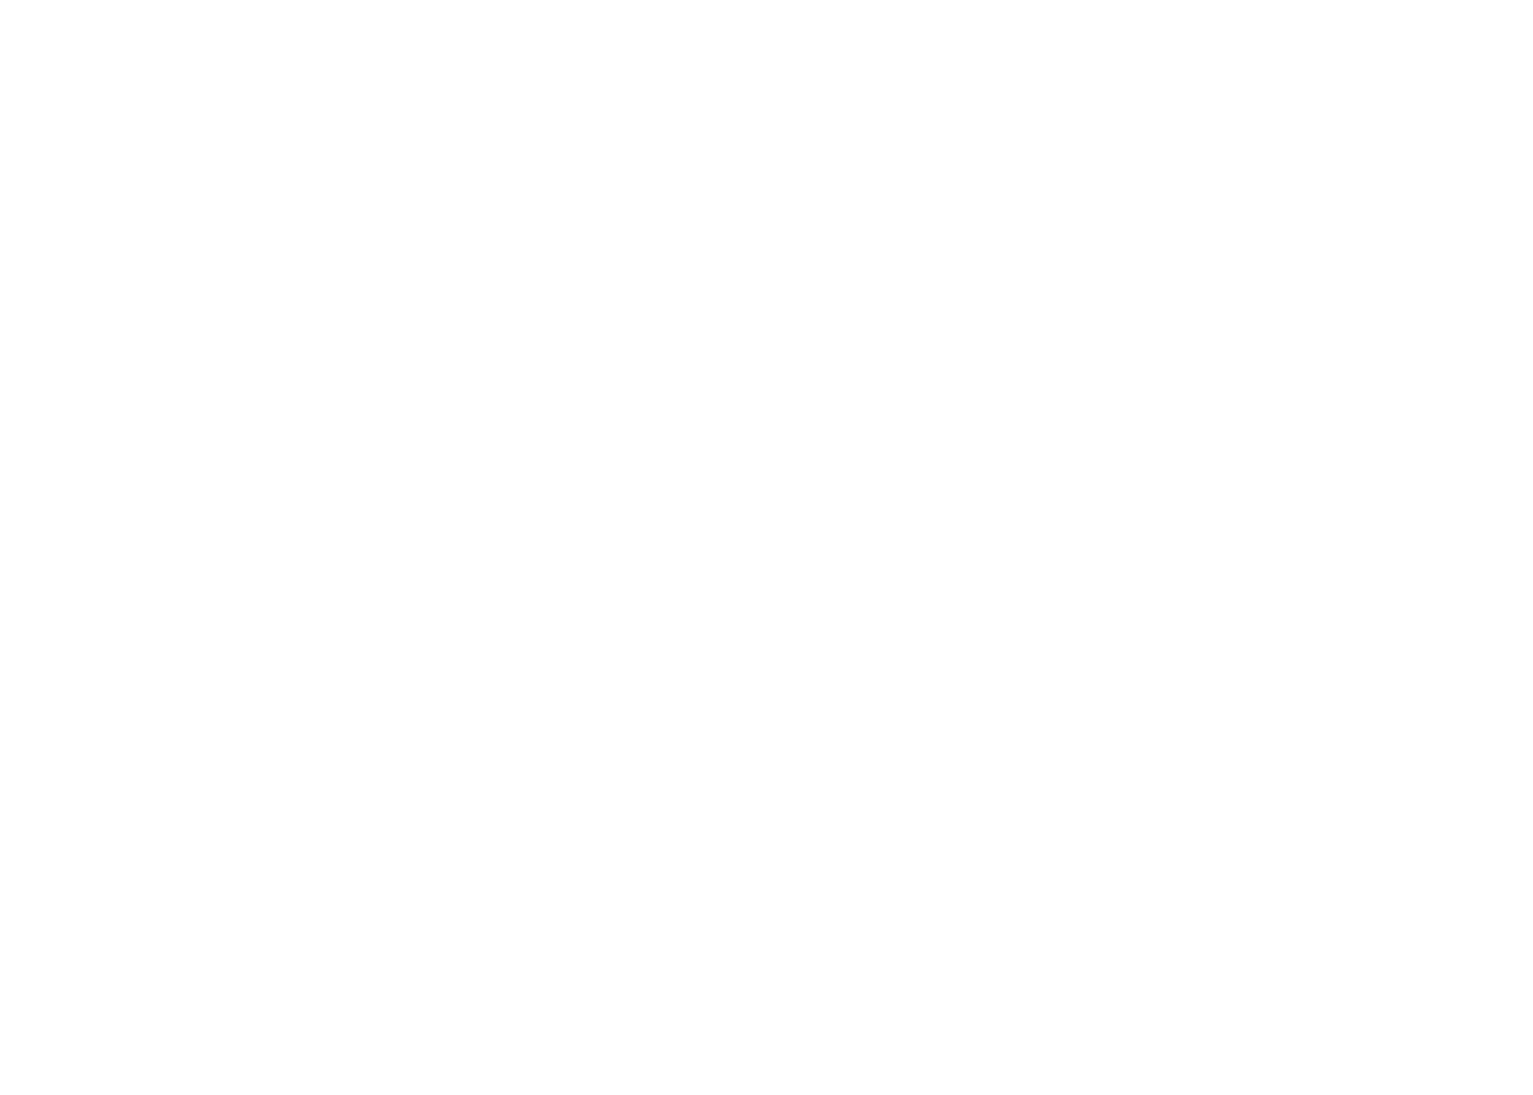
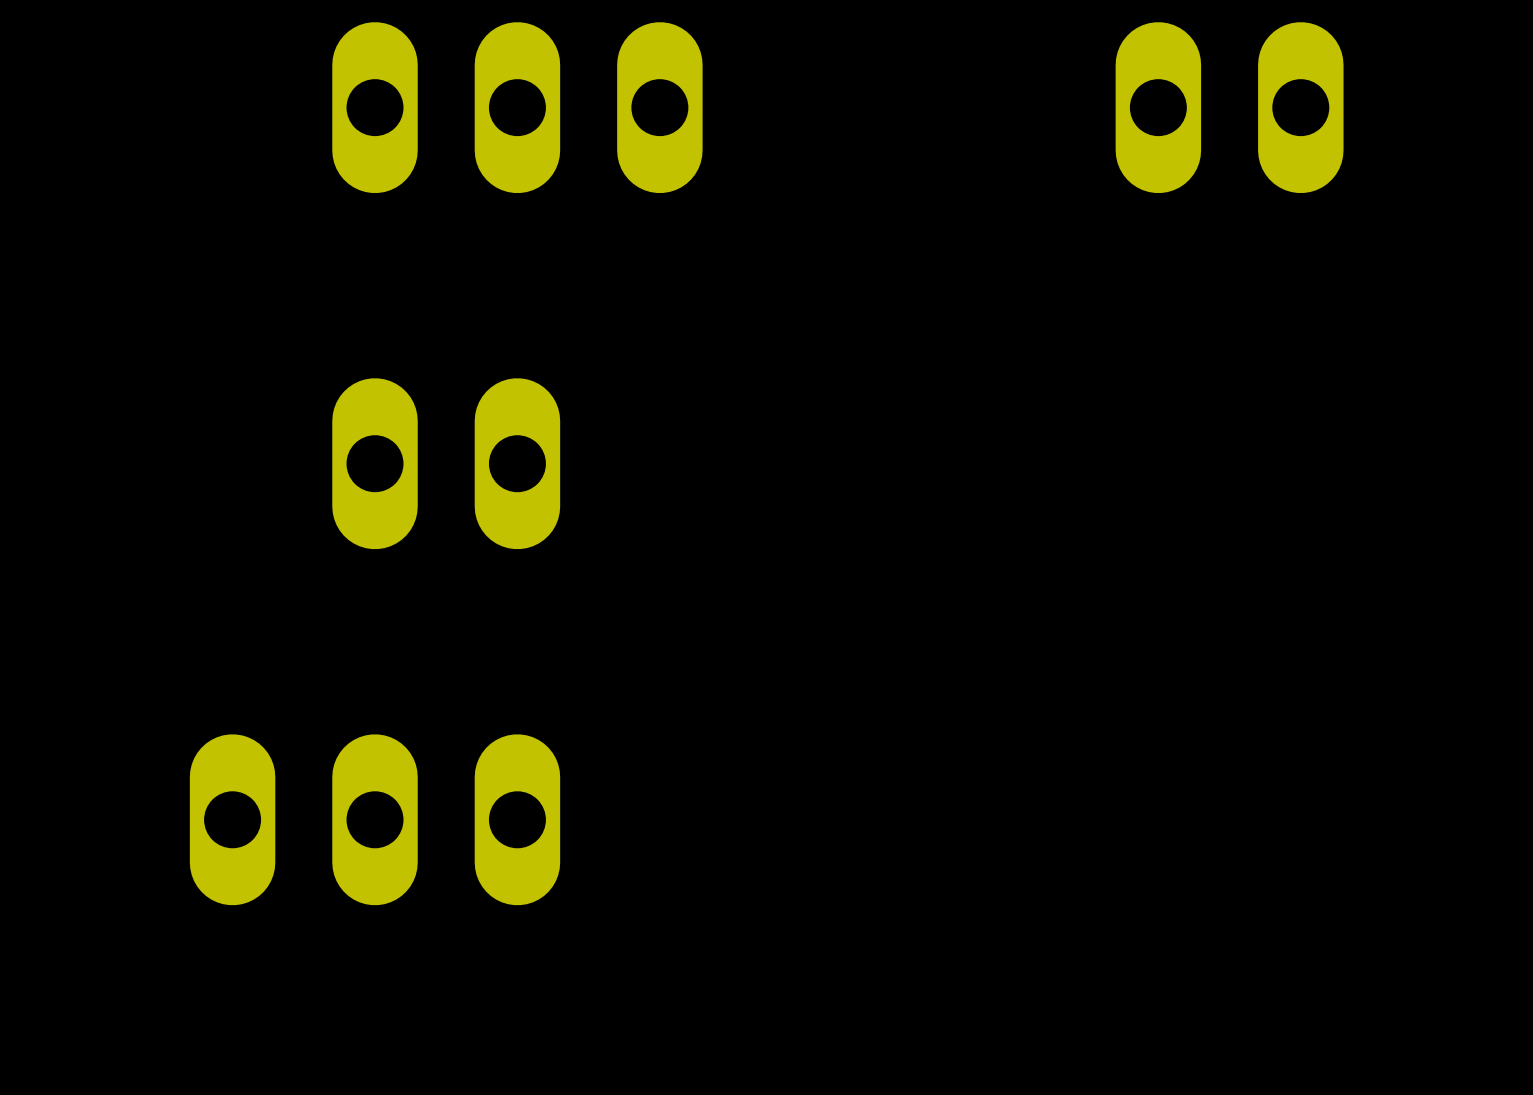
part: none -> (517, 107)
part: none -> (1229, 107)
part: none -> (446, 463)
part: none -> (375, 819)

